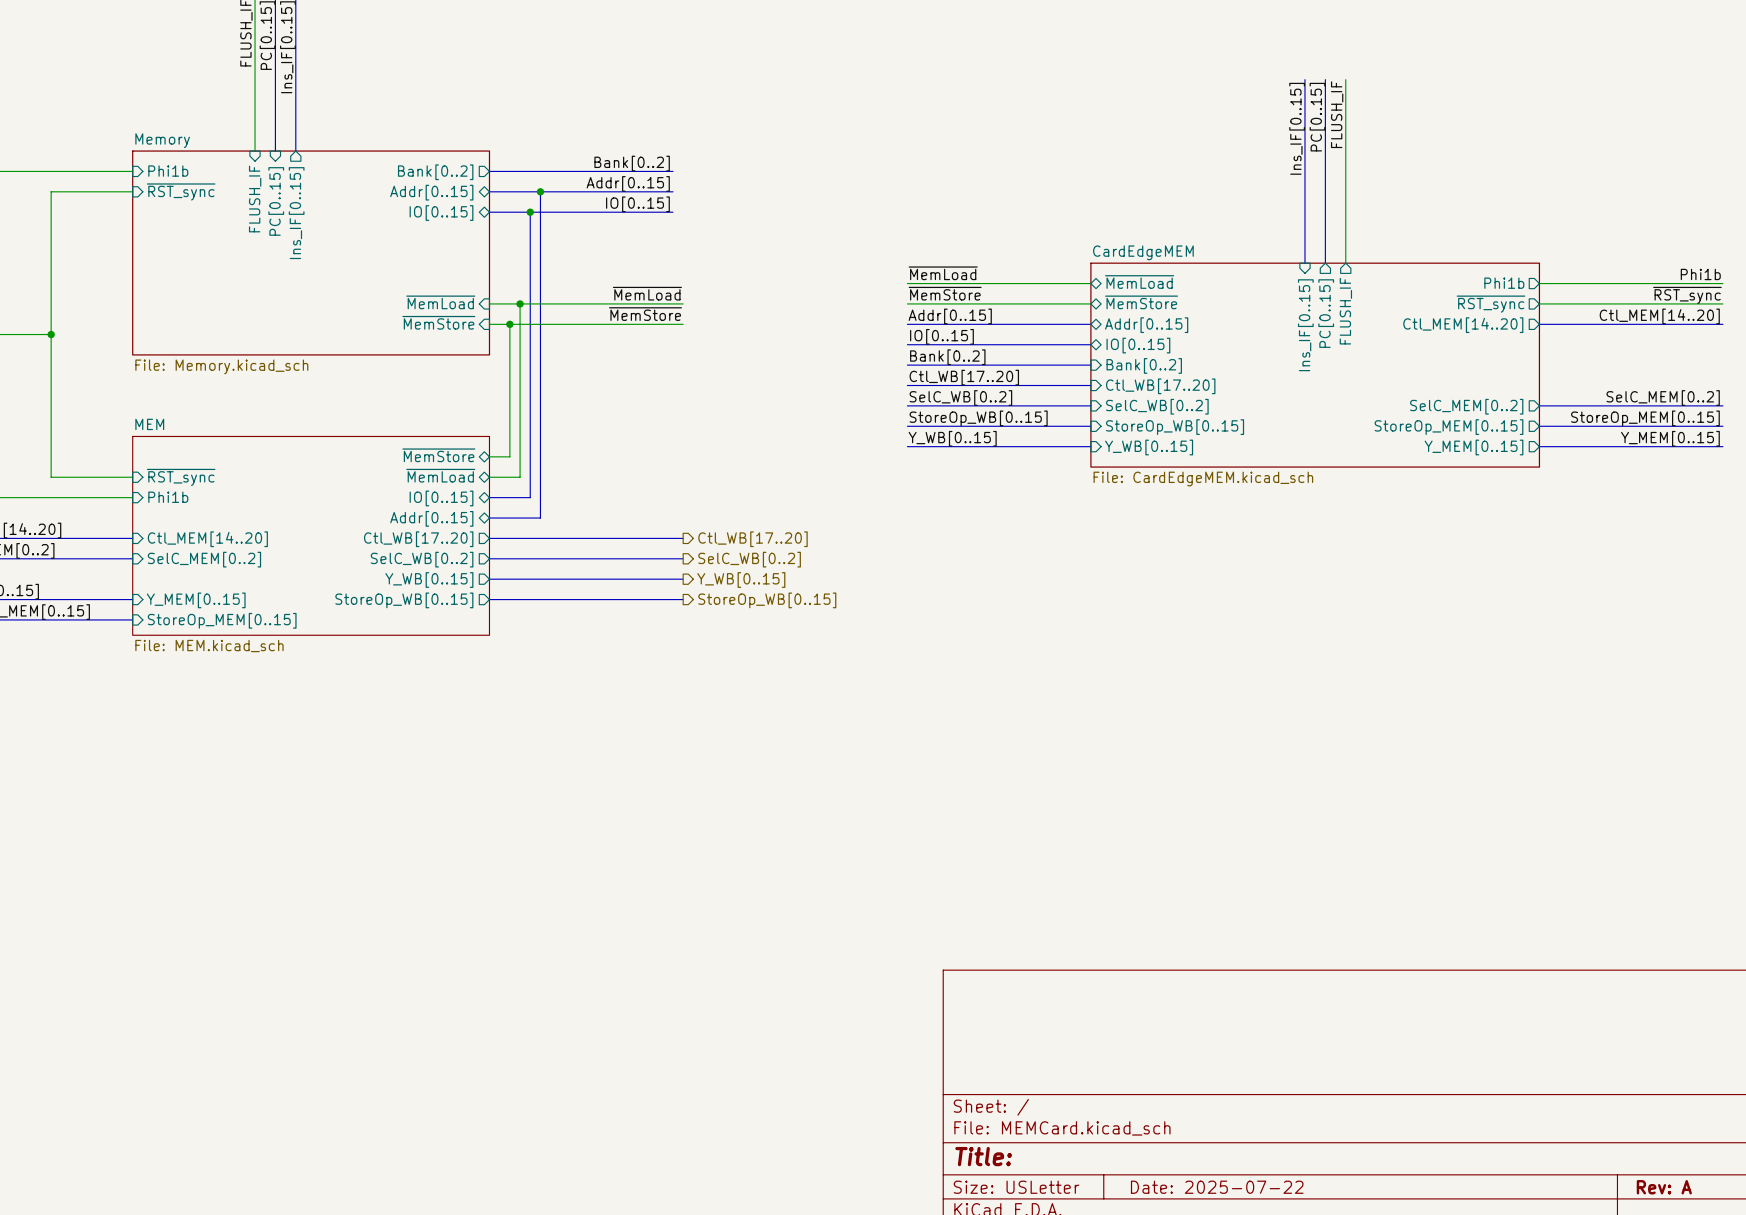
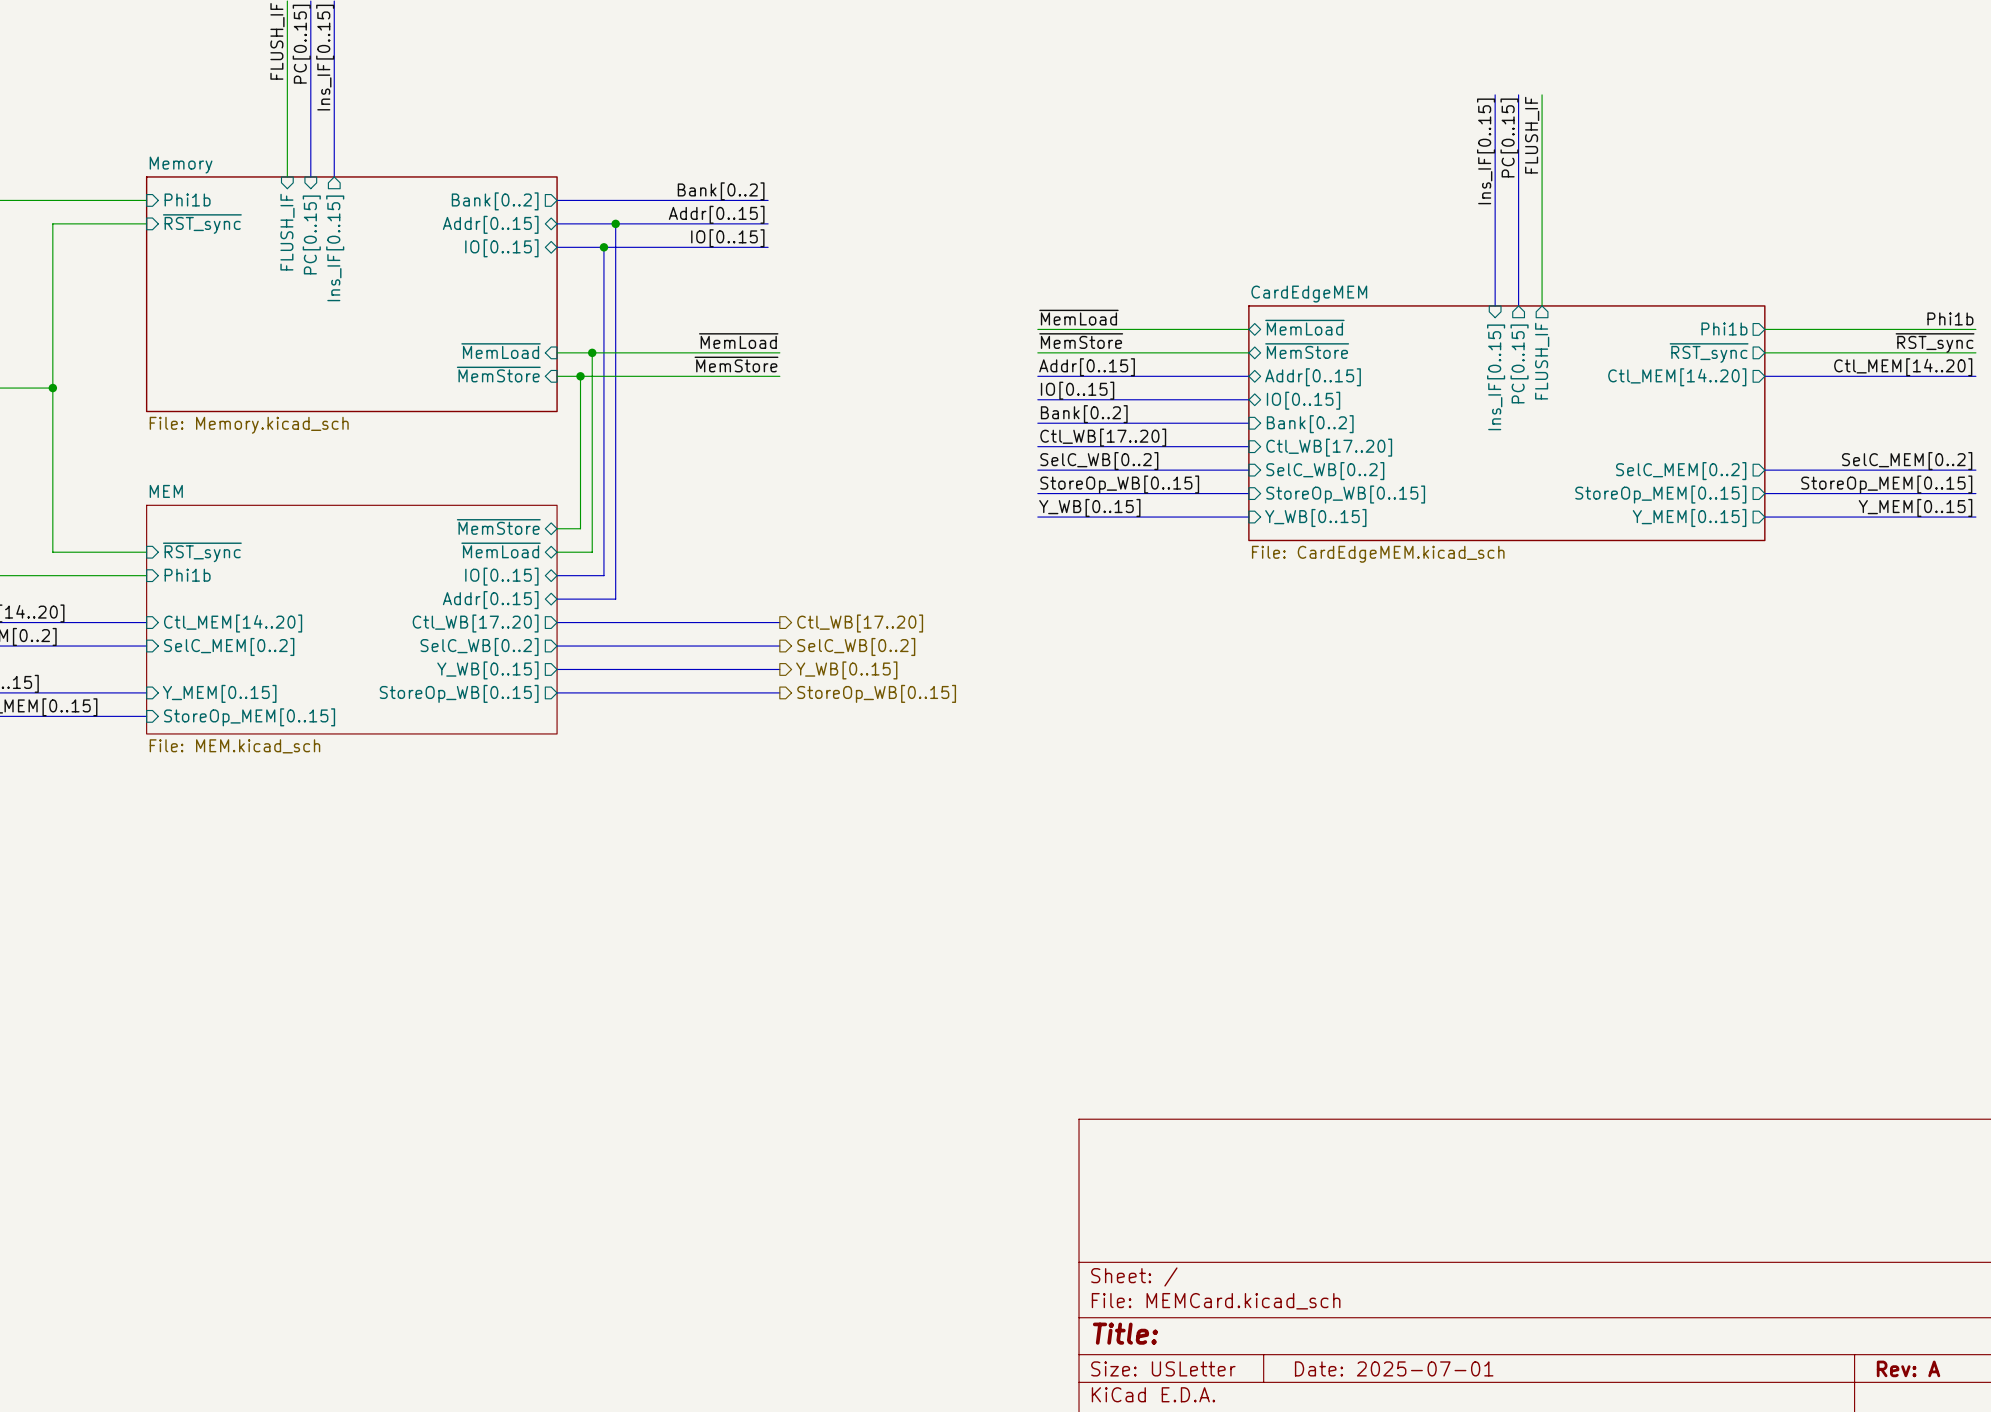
title block: Date: 2025-07-22 (1217, 1187) -> Date: 2025-07-01 (1394, 1368)

